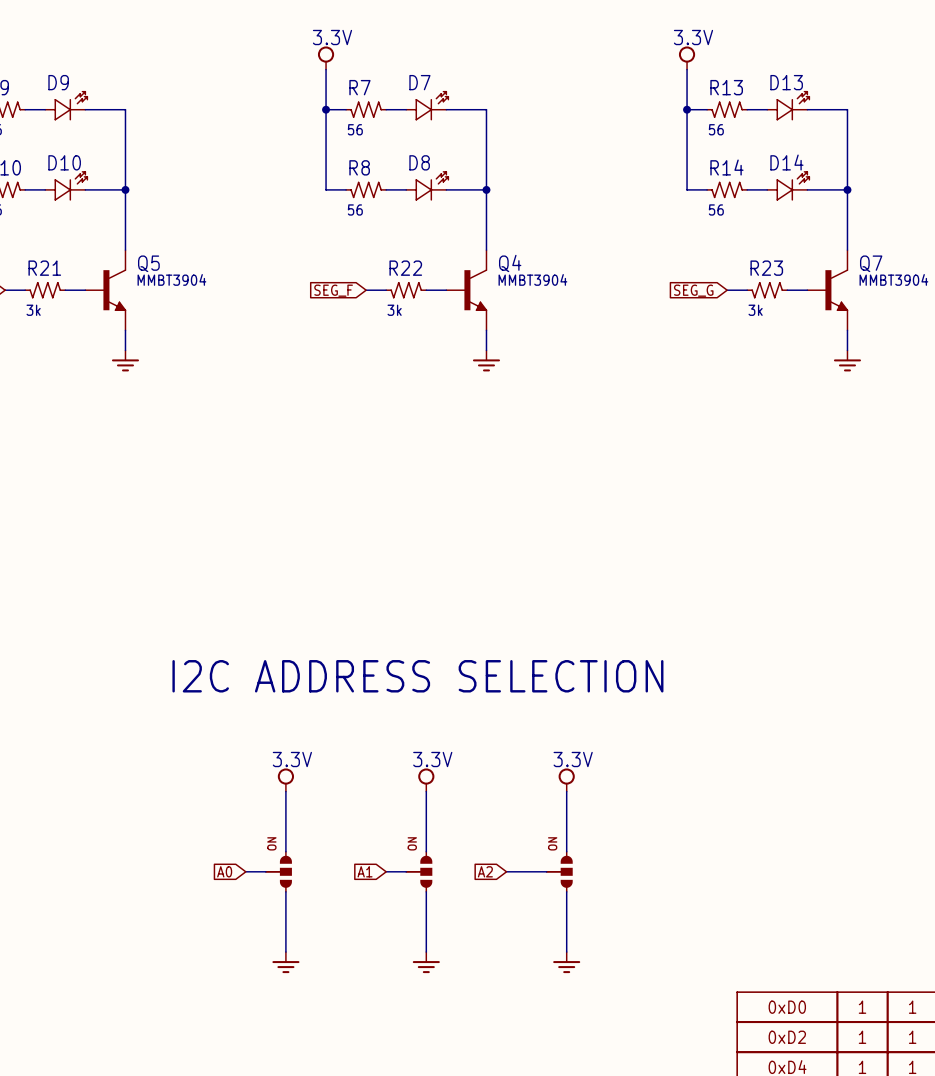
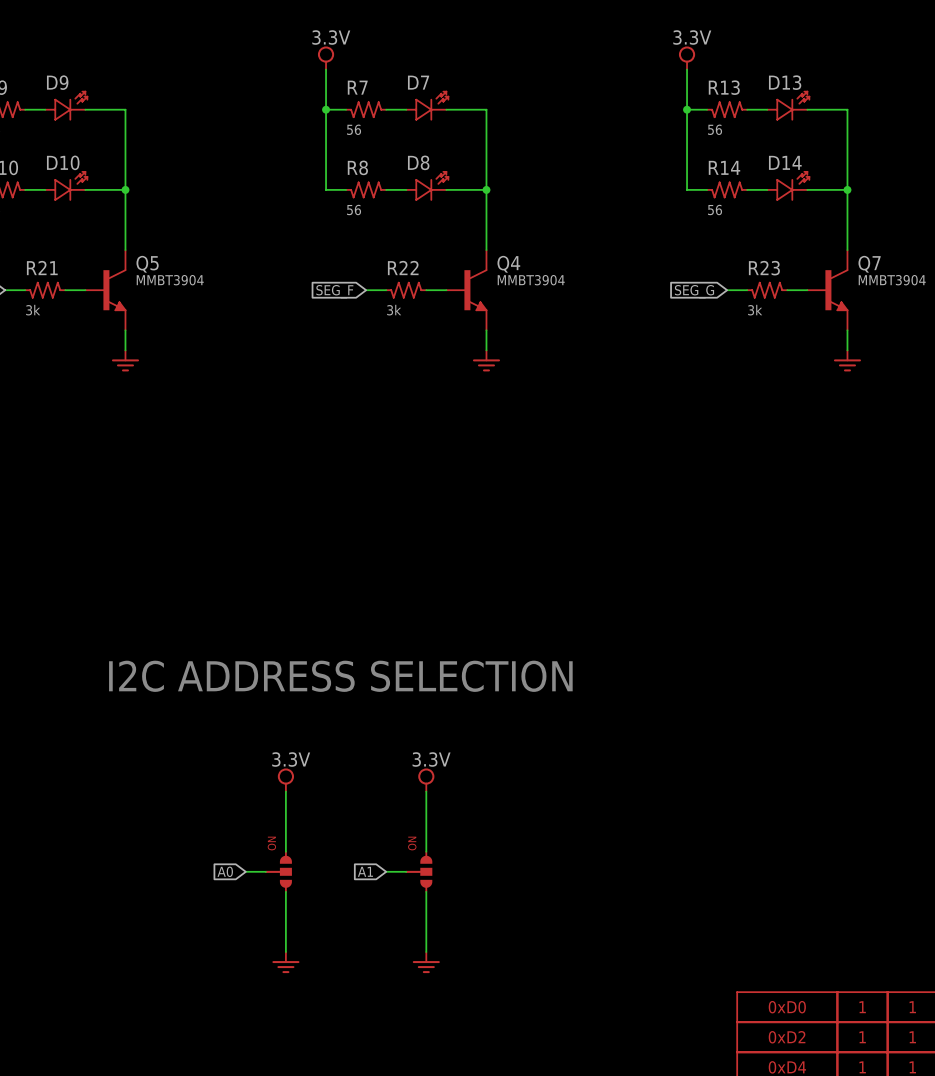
text position: I2C ADDRESS SELECTION (417, 676) -> I2C ADDRESS SELECTION (340, 676)
power symbol: 3.3V (566, 780) -> none
wire: (566, 791) (566, 851) -> none
global label: A2 (485, 871) -> none
wire: (506, 871) (546, 871) -> none
part: (559, 871) -> none
wire: (566, 891) (566, 952) -> none
power symbol: (566, 962) -> none

